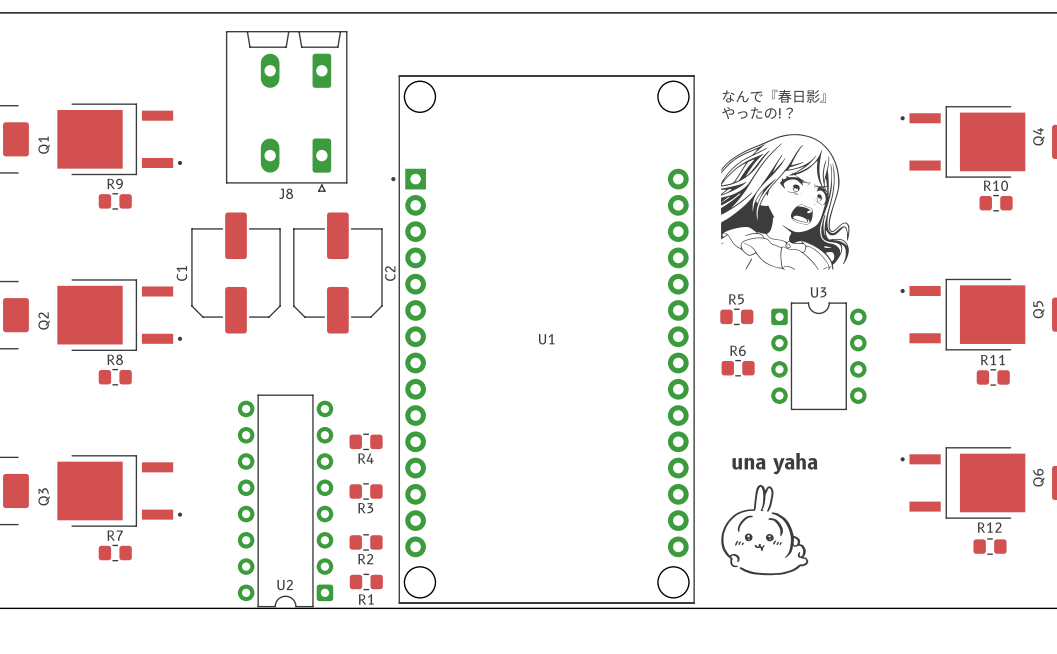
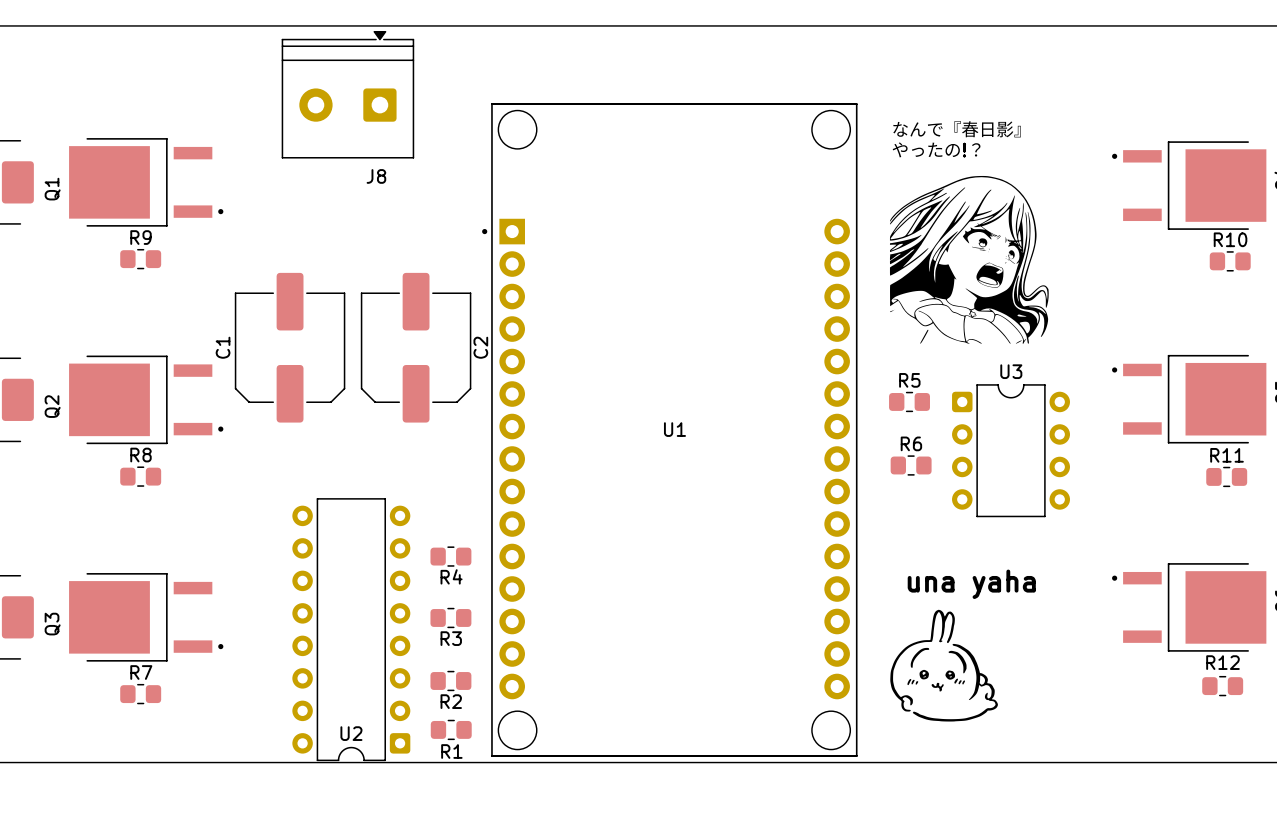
J8 footprint: [225, 31, 348, 192] -> [281, 30, 415, 159]
J8 name position: J8 (286, 193) -> J8 (376, 176)

